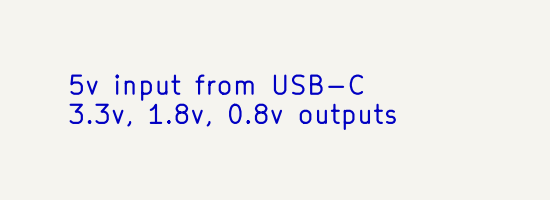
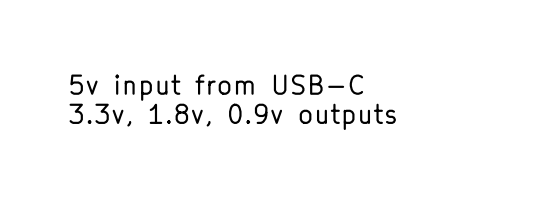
text: 3.3v, 1.8v, 0.8v outputs (232, 116) -> 3.3v, 1.8v, 0.9v outputs (232, 116)

